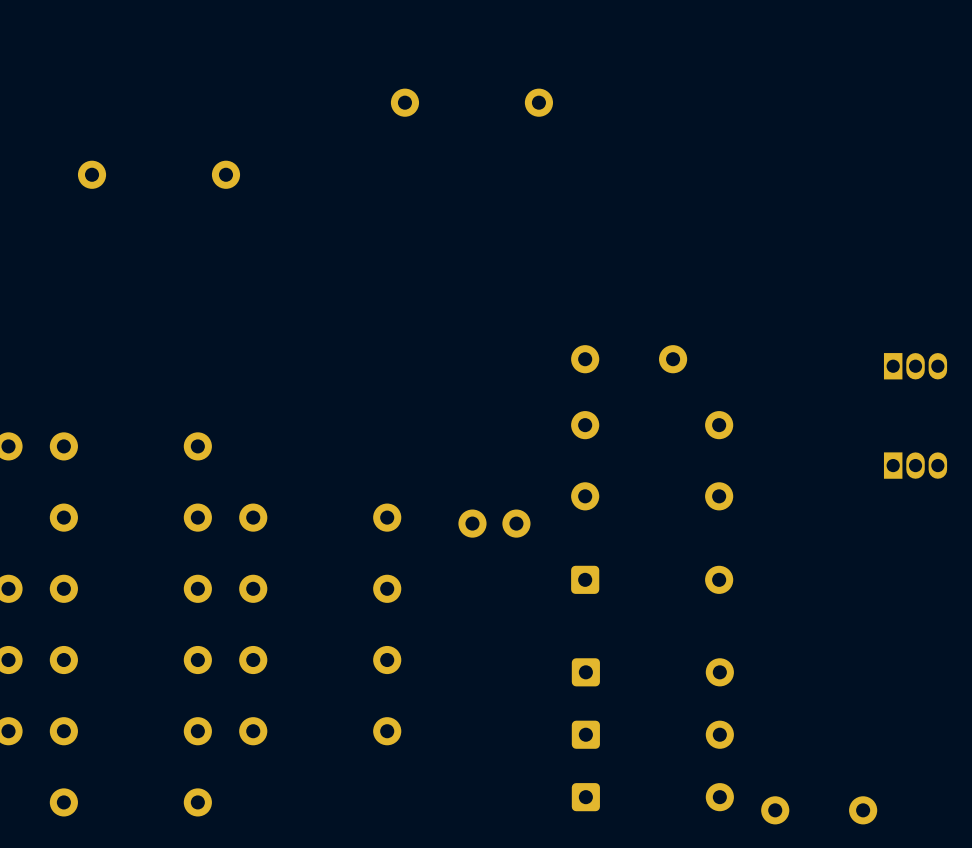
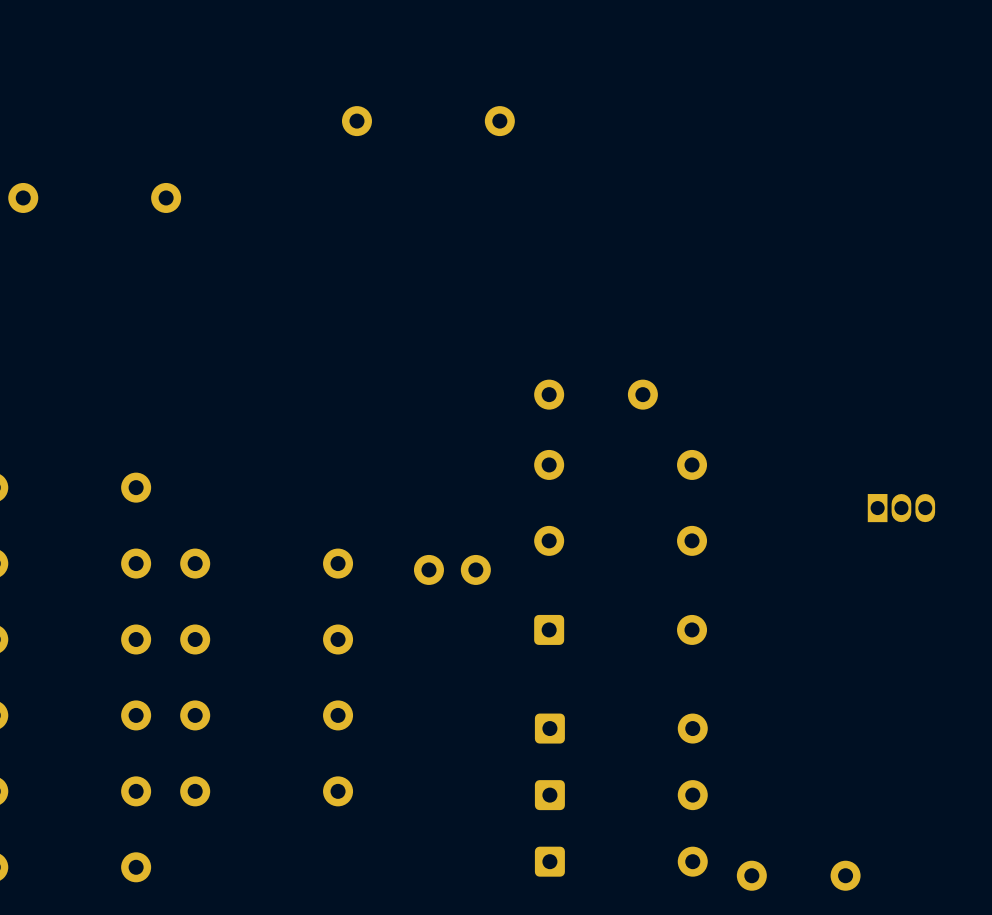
part: (915, 366) -> none

